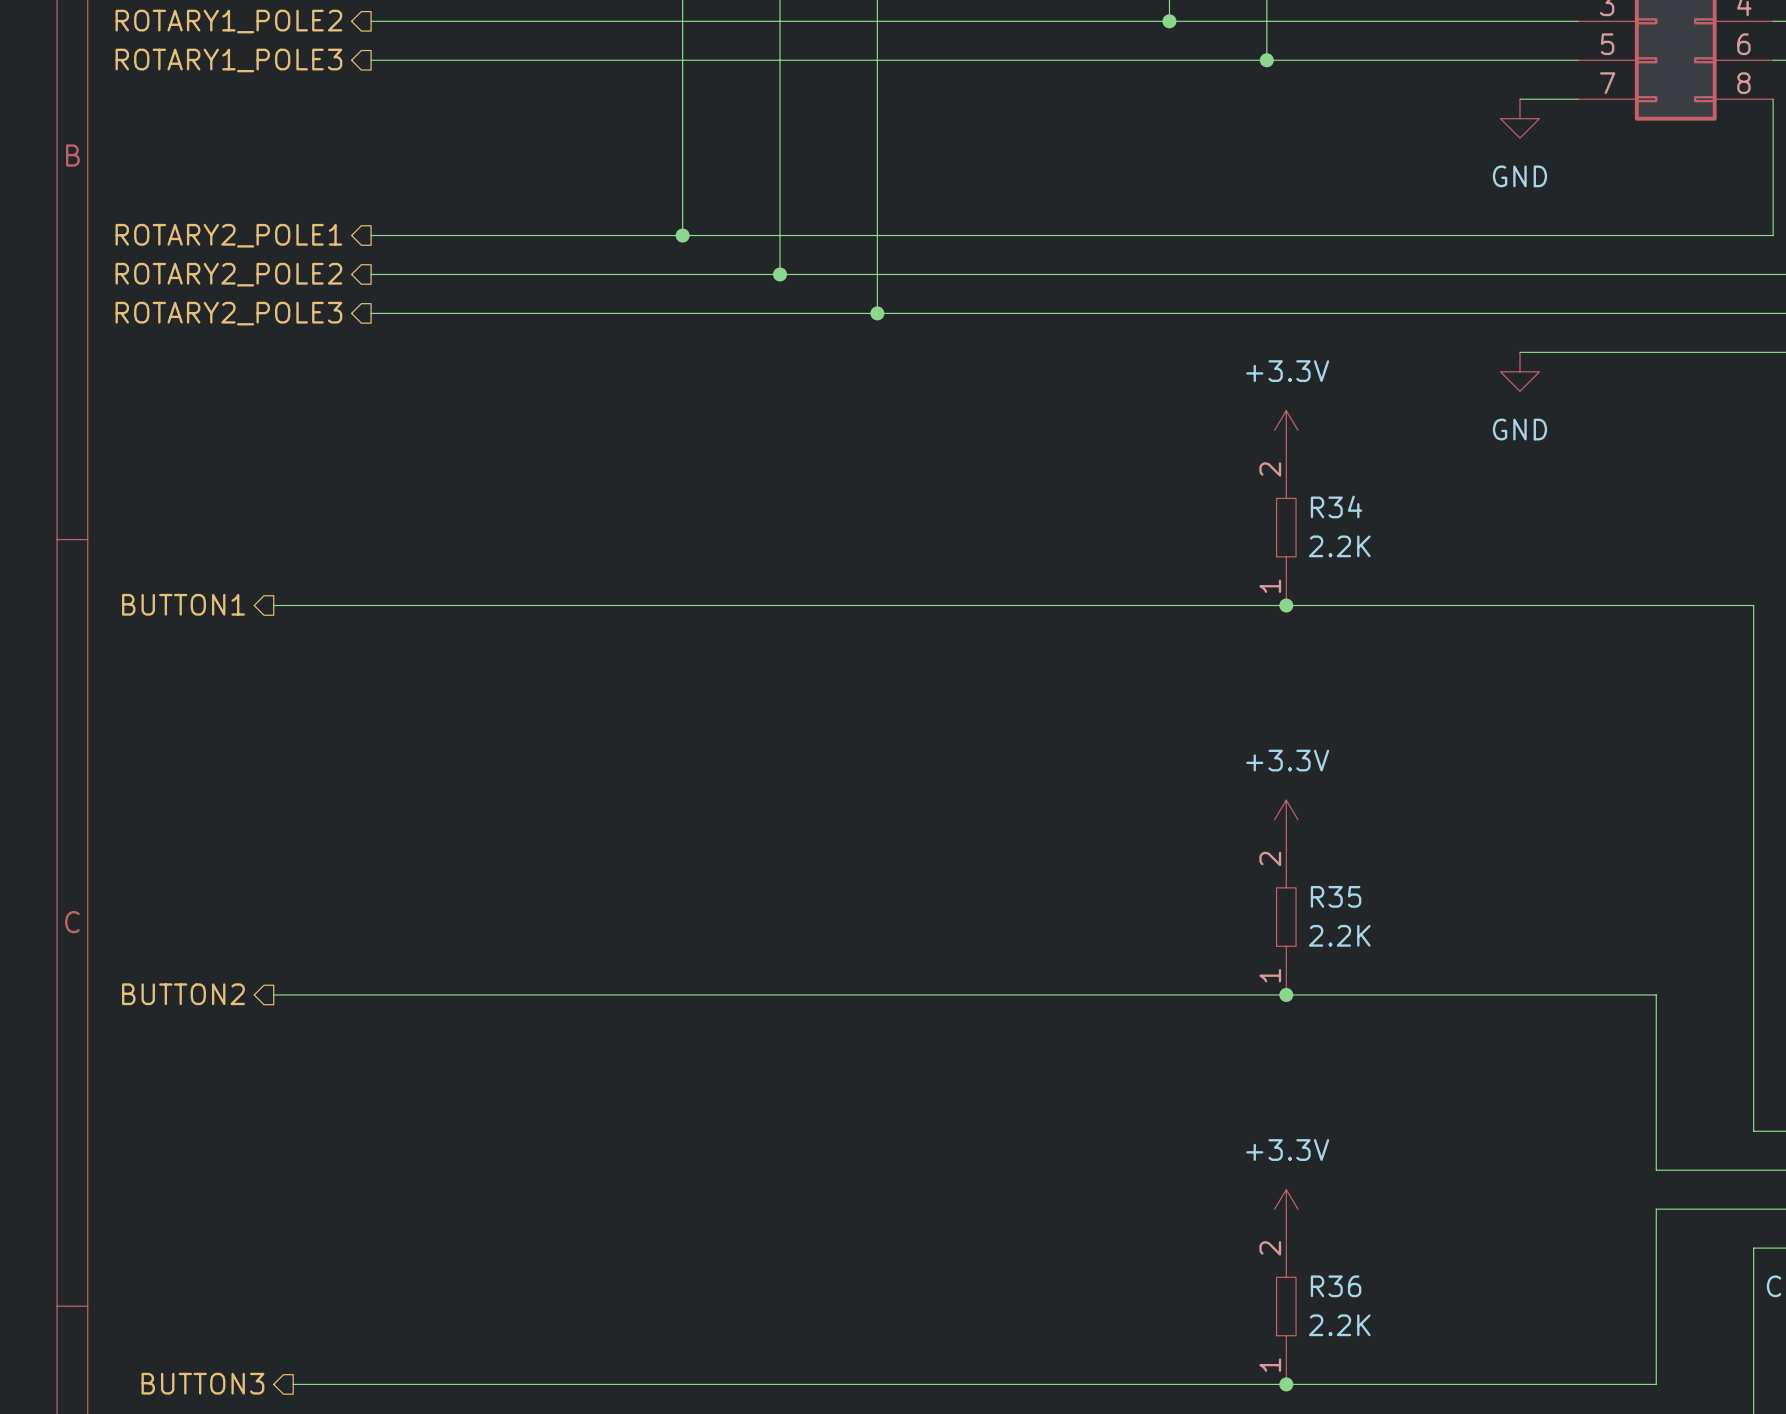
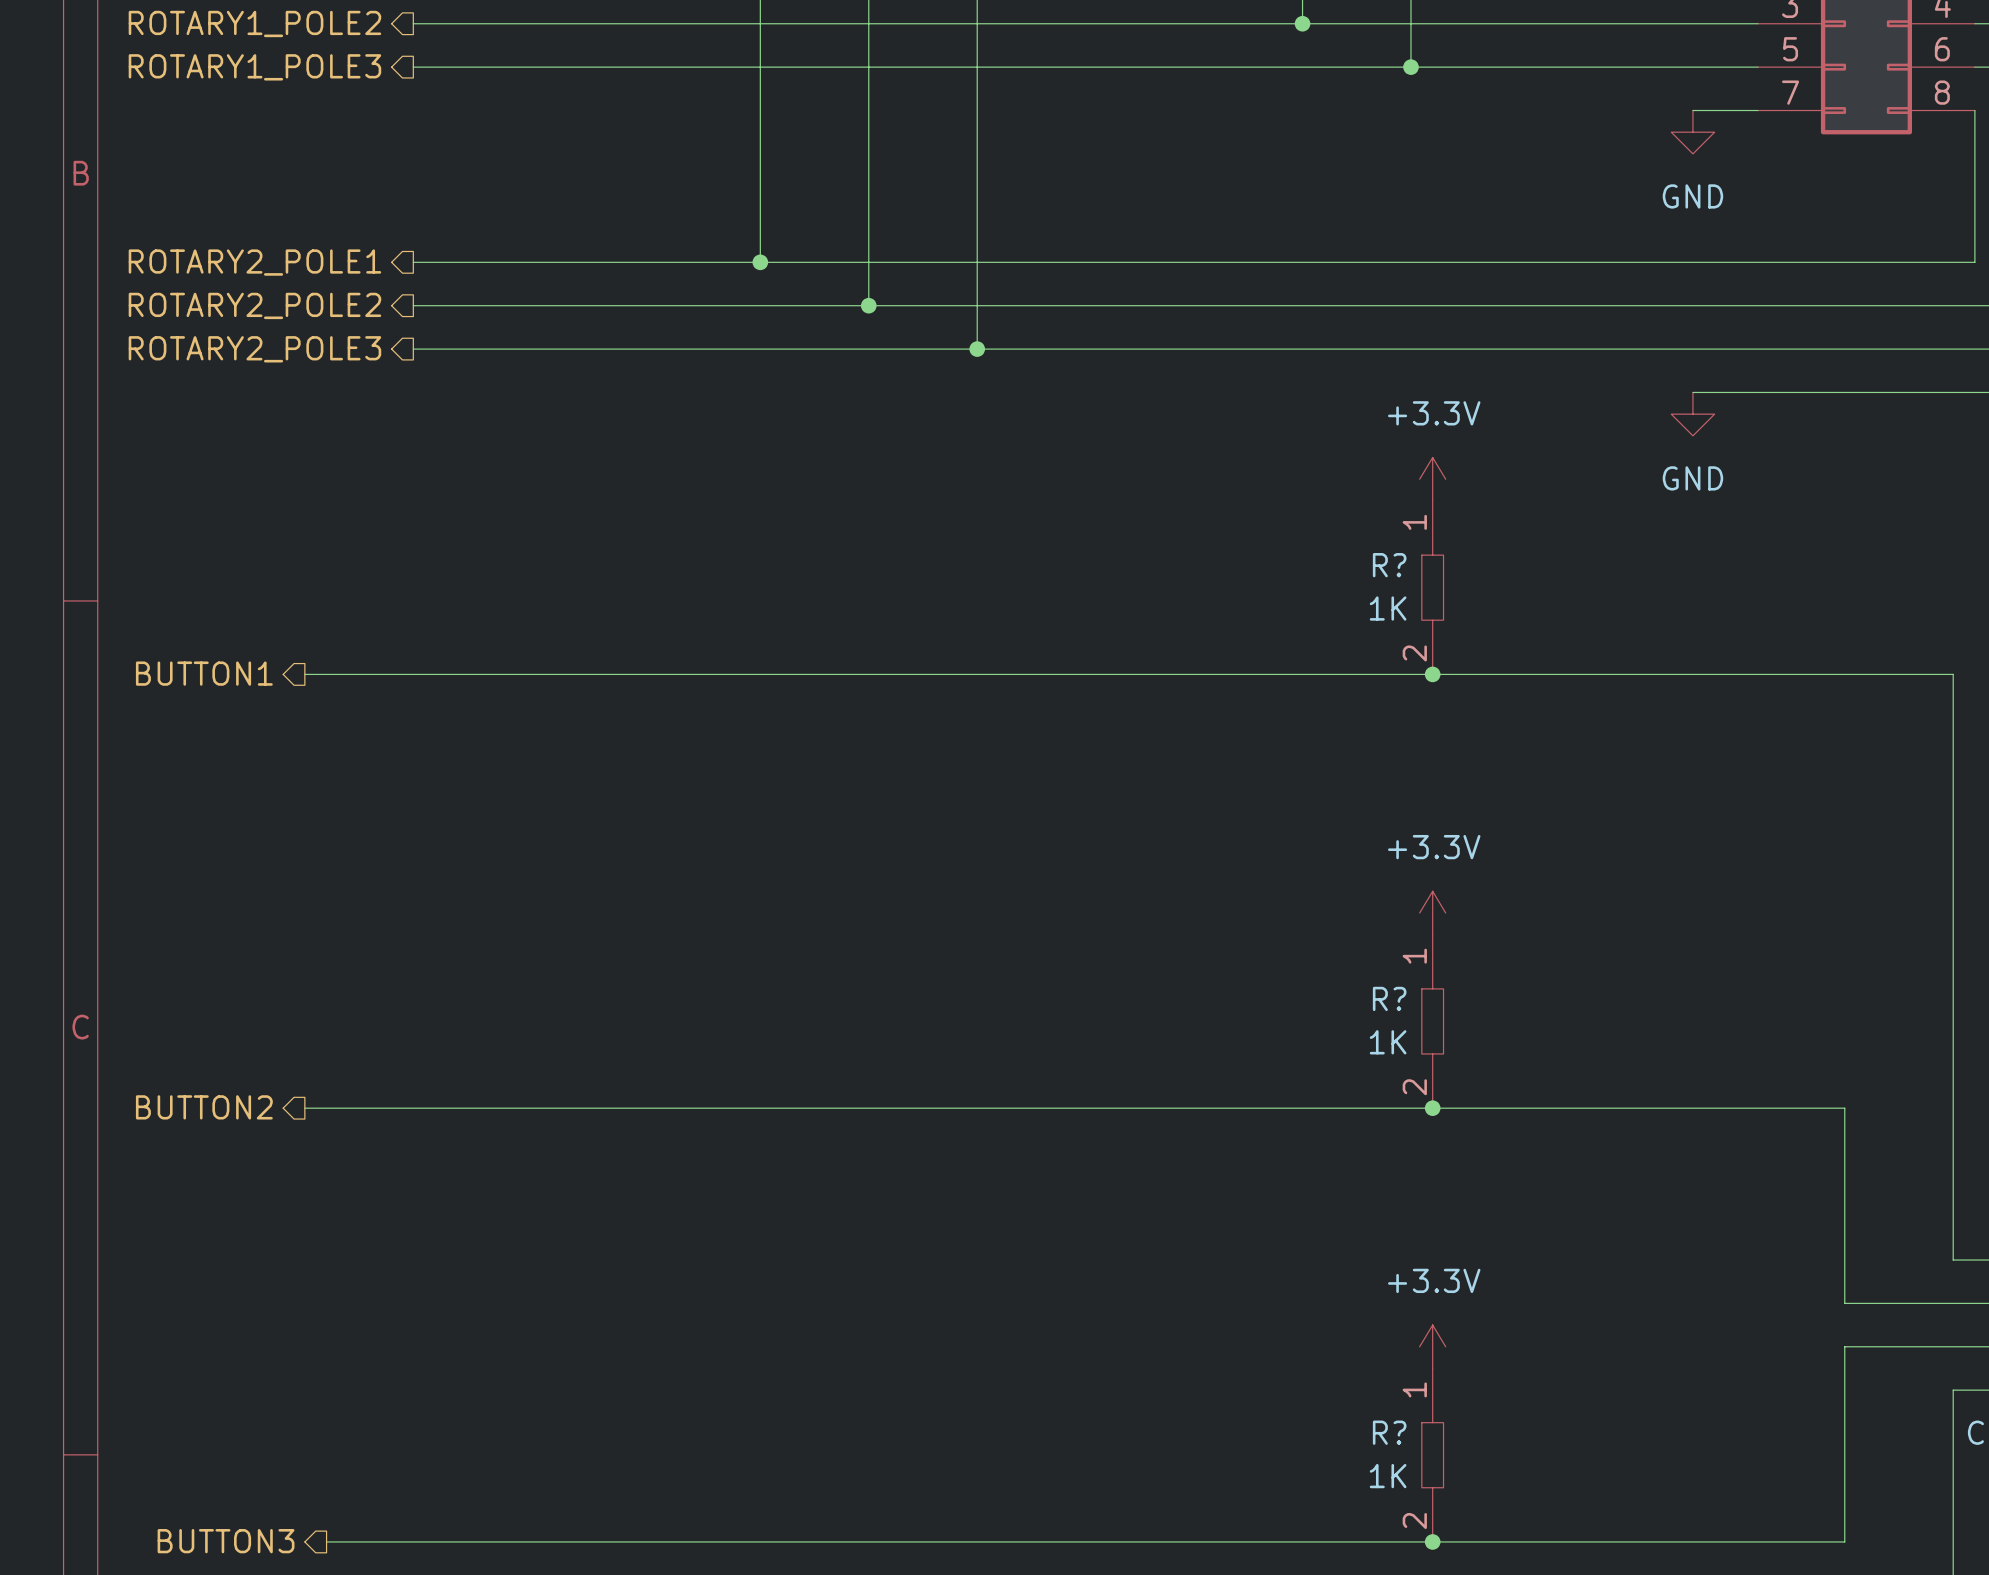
R34 name: R34 (1336, 506) -> R? (1389, 565)
R34 rotation: 0° (1286, 527) -> 180° (1432, 587)
R34 text: 2.2K (1339, 546) -> 1K (1388, 608)
R35 name: R35 (1336, 896) -> R? (1389, 998)
R35 rotation: 0° (1286, 917) -> 180° (1432, 1021)
R35 text: 2.2K (1339, 935) -> 1K (1388, 1042)
R36 name: R36 (1336, 1286) -> R? (1389, 1432)
R36 rotation: 0° (1286, 1306) -> 180° (1432, 1455)
R36 text: 2.2K (1339, 1325) -> 1K (1388, 1476)

